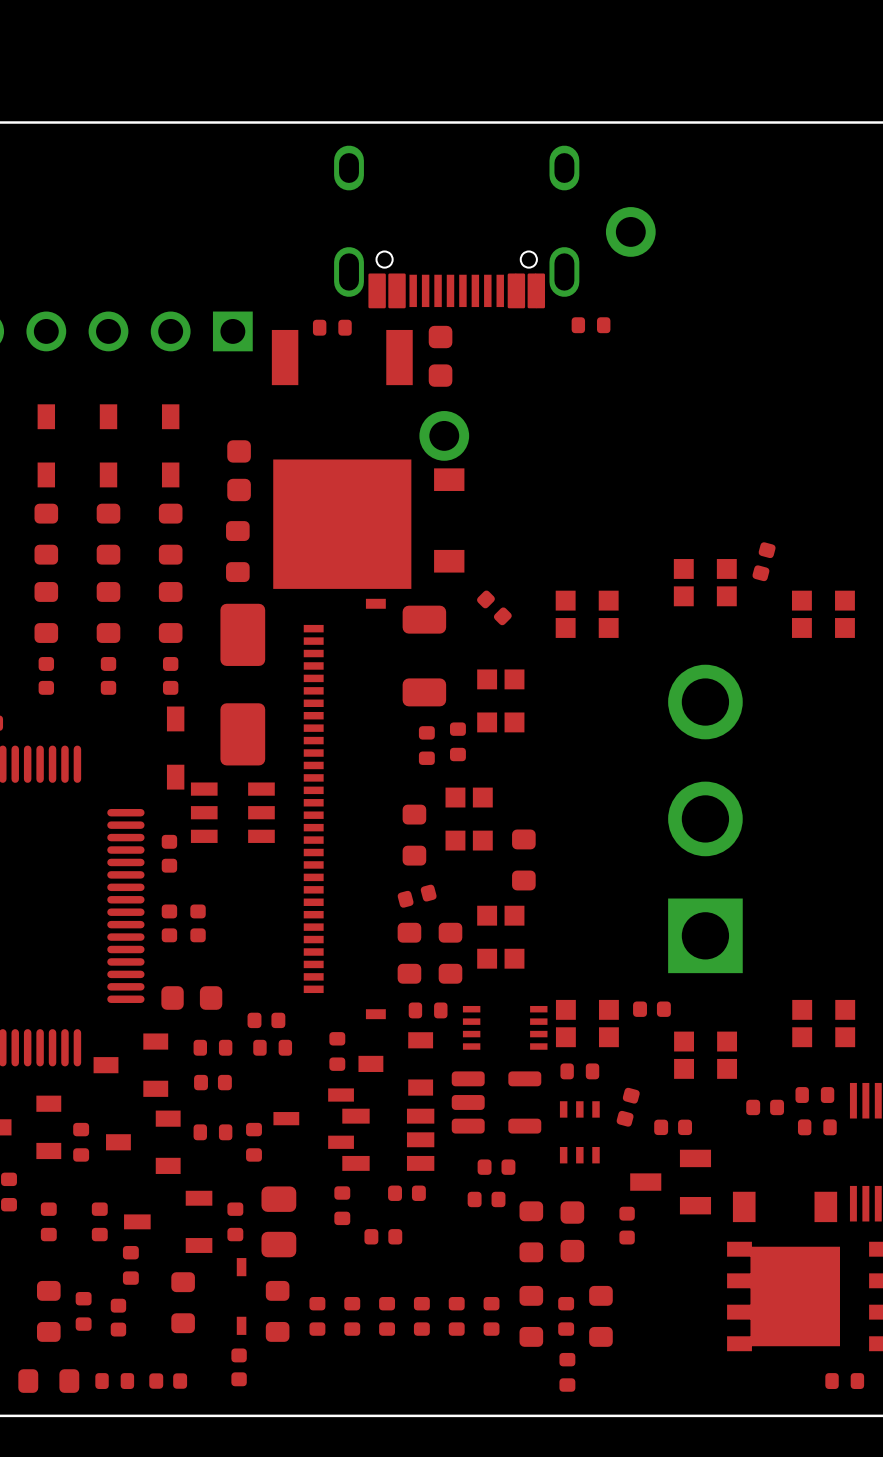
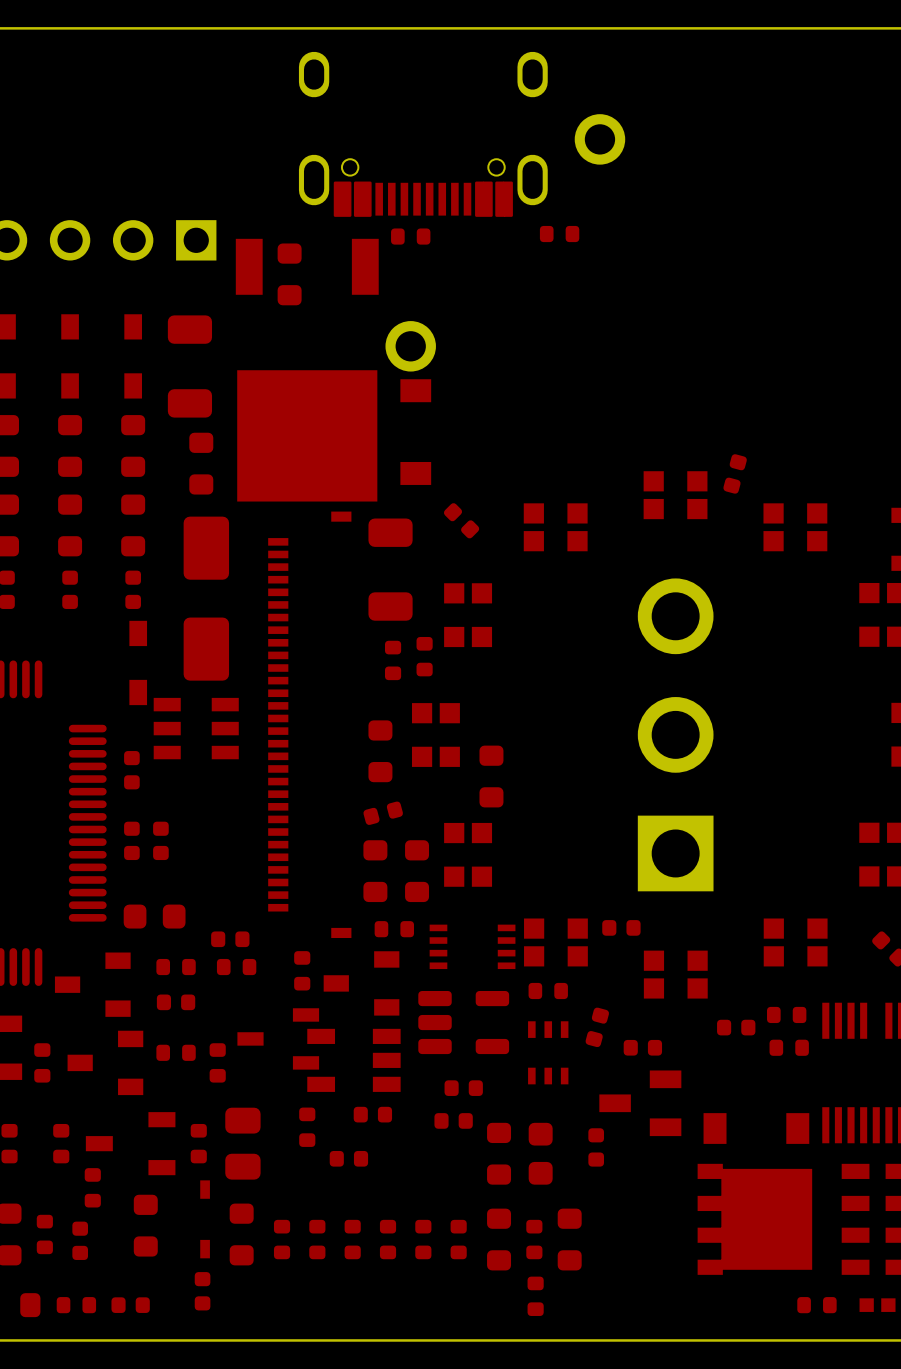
part position: (332, 327) -> (410, 236)
part: (440, 356) -> none
part: none -> (289, 274)
part footprint: [227, 440, 251, 502] -> [167, 315, 213, 418]

